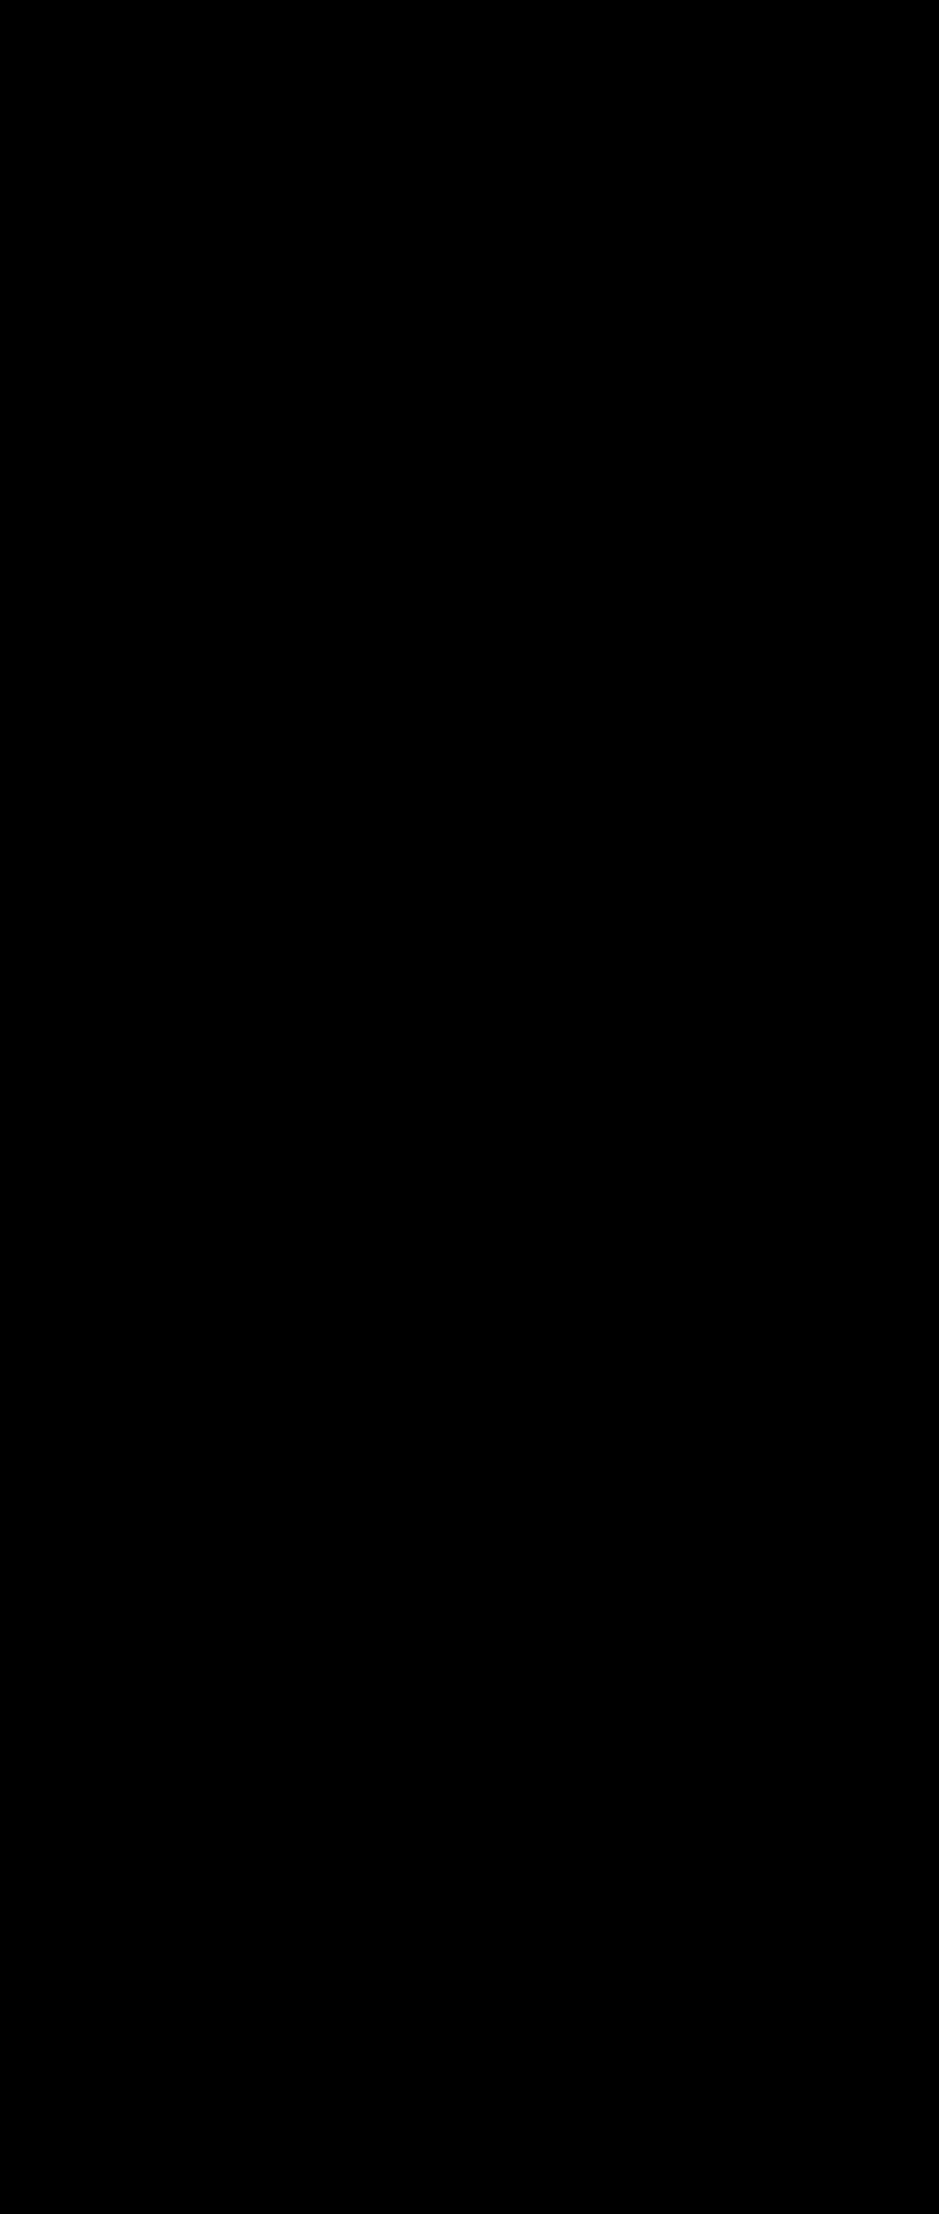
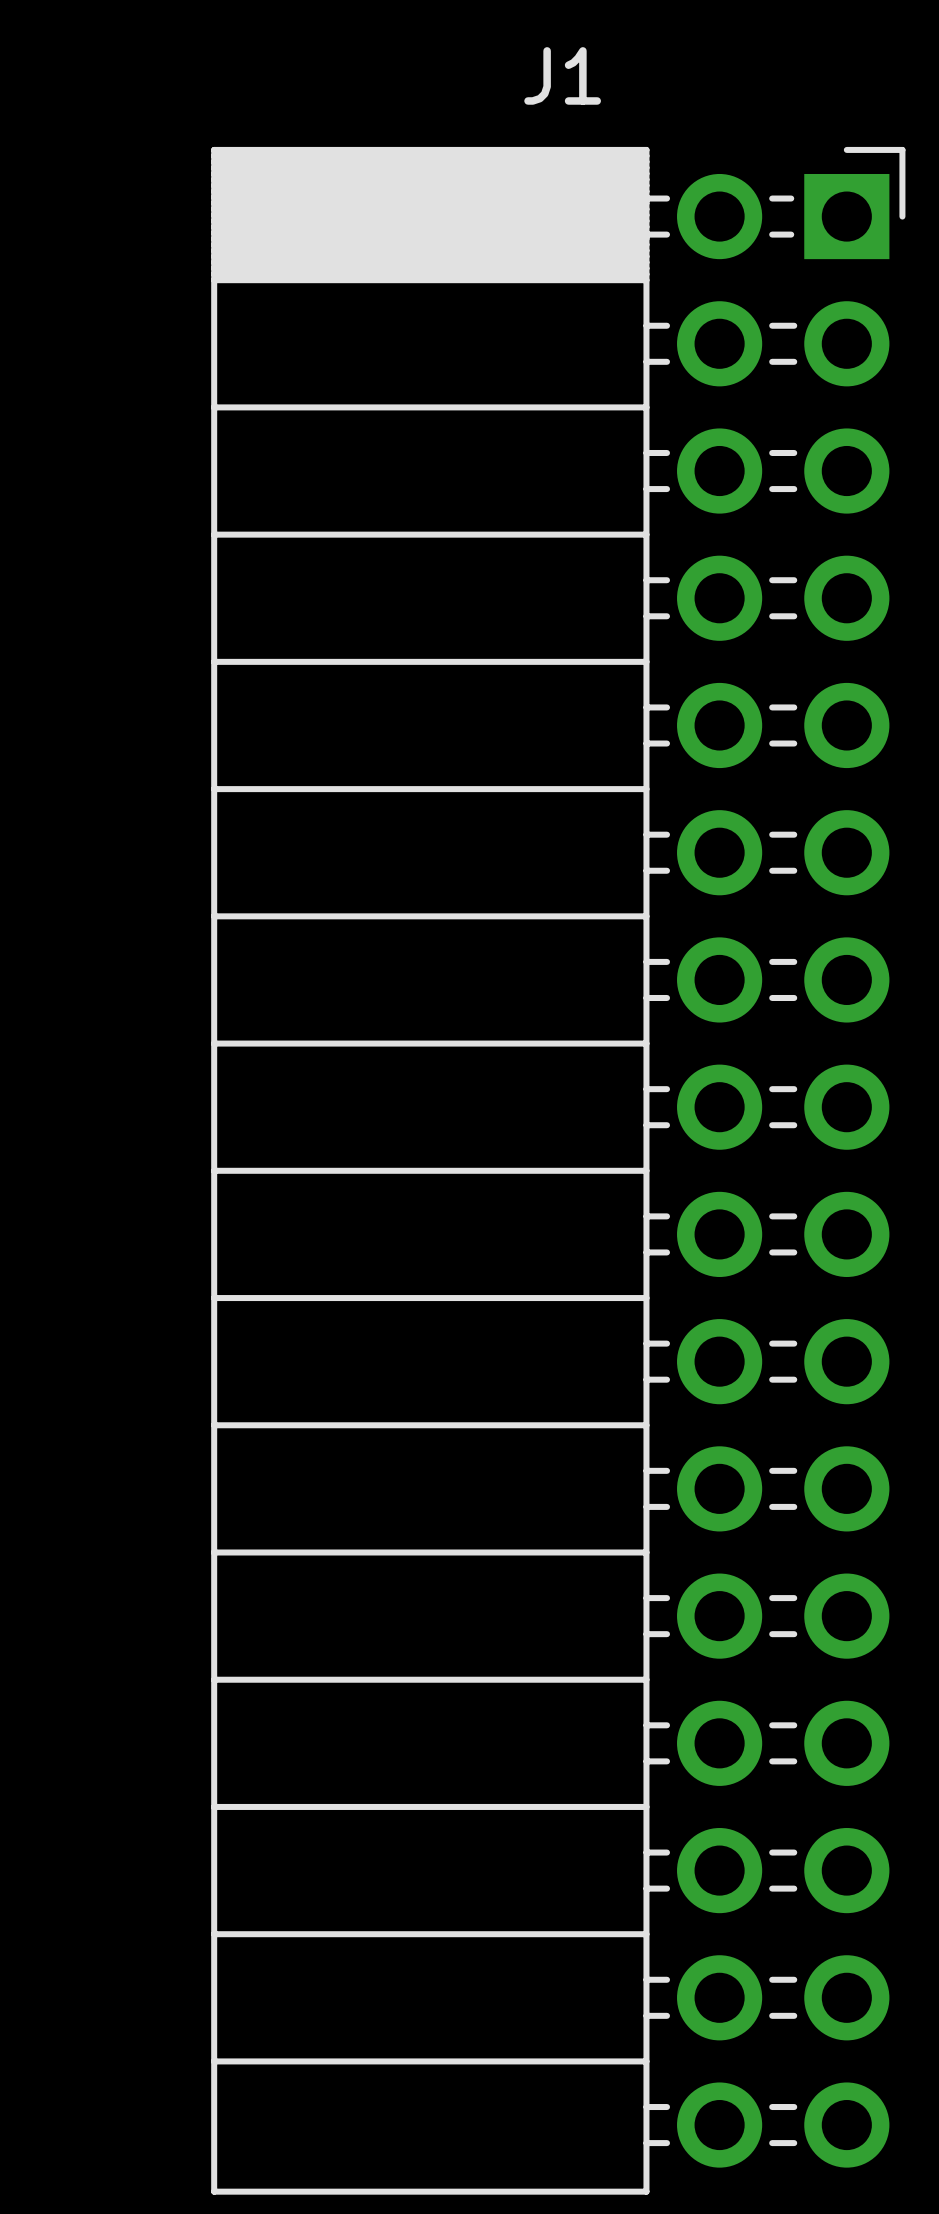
J1: none -> (558, 1170)

